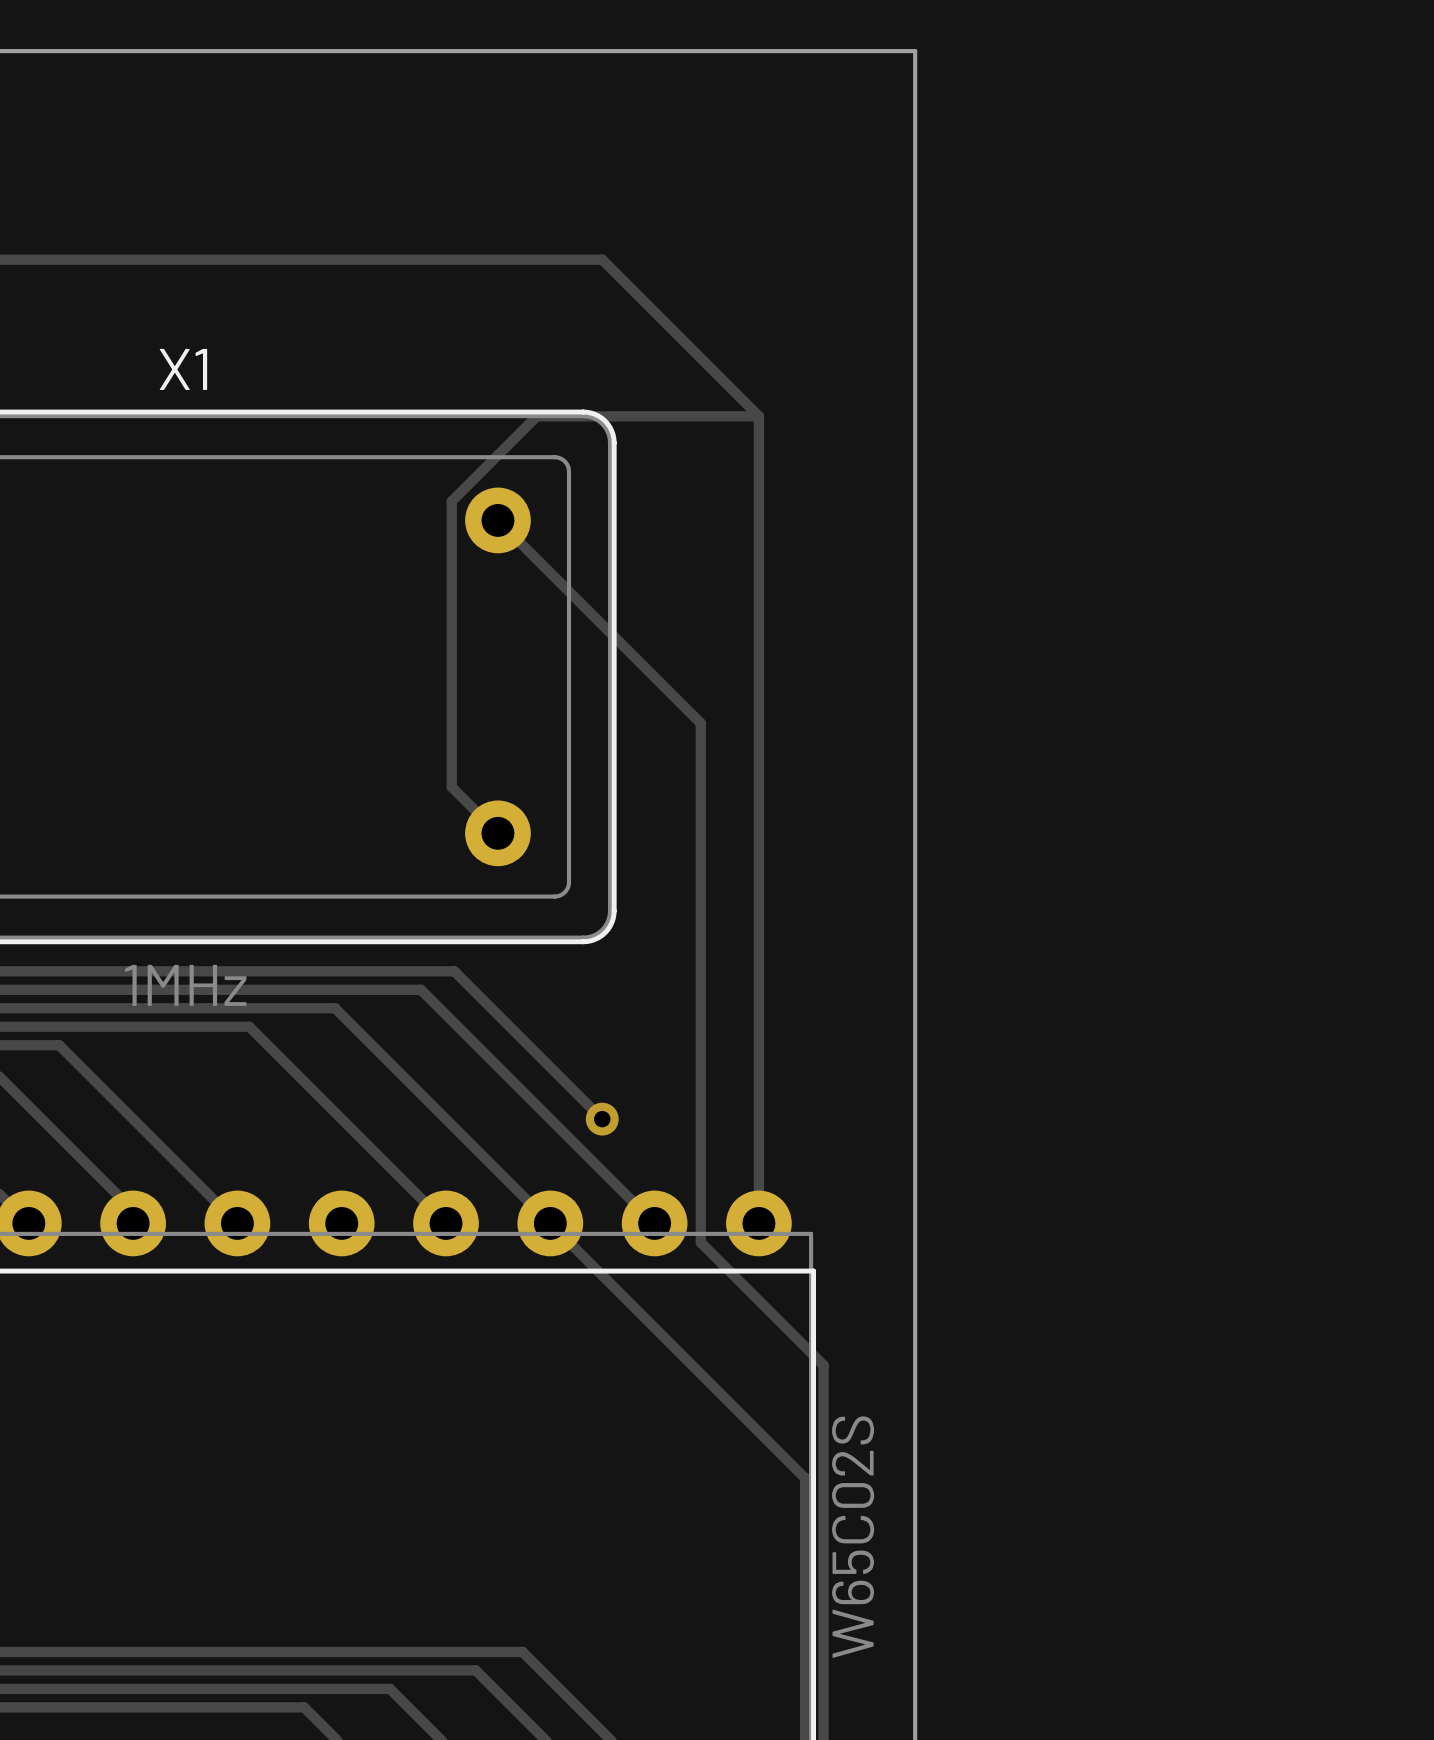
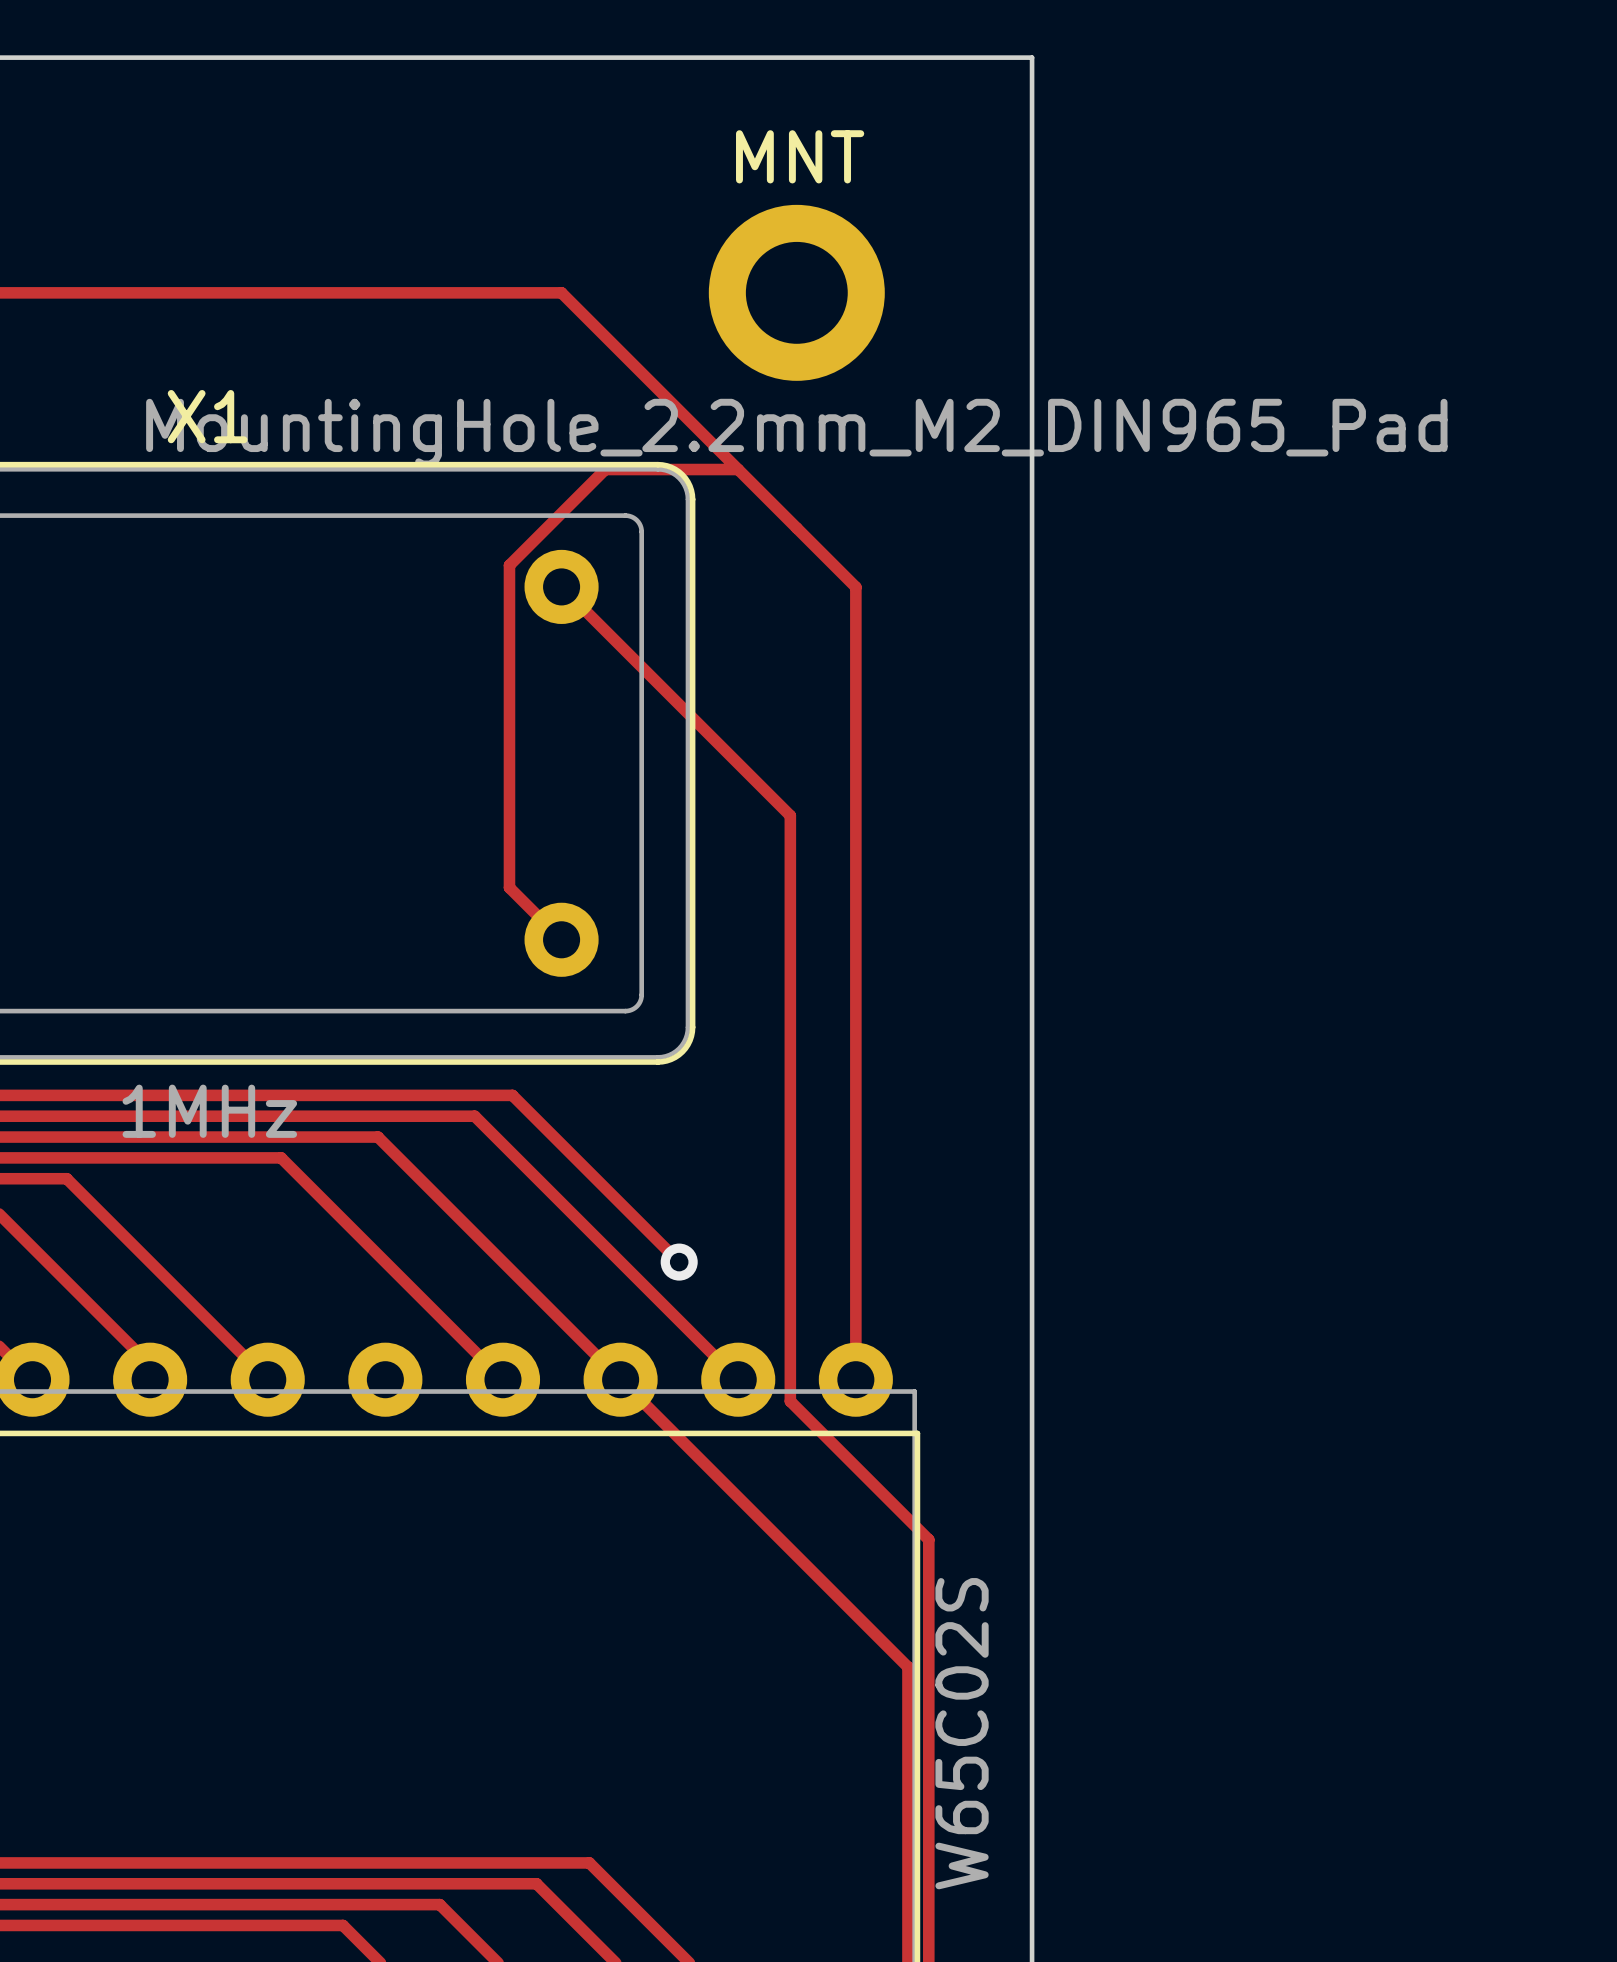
track: (497, 259) (602, 259) (758, 416) -> (561, 292) (855, 587)
MNT: none -> MountingHole_2.2mm_M2_DIN965_Pad (796, 292)
track: (654, 416) (758, 416) -> none
track: (758, 416) (758, 520) -> none

